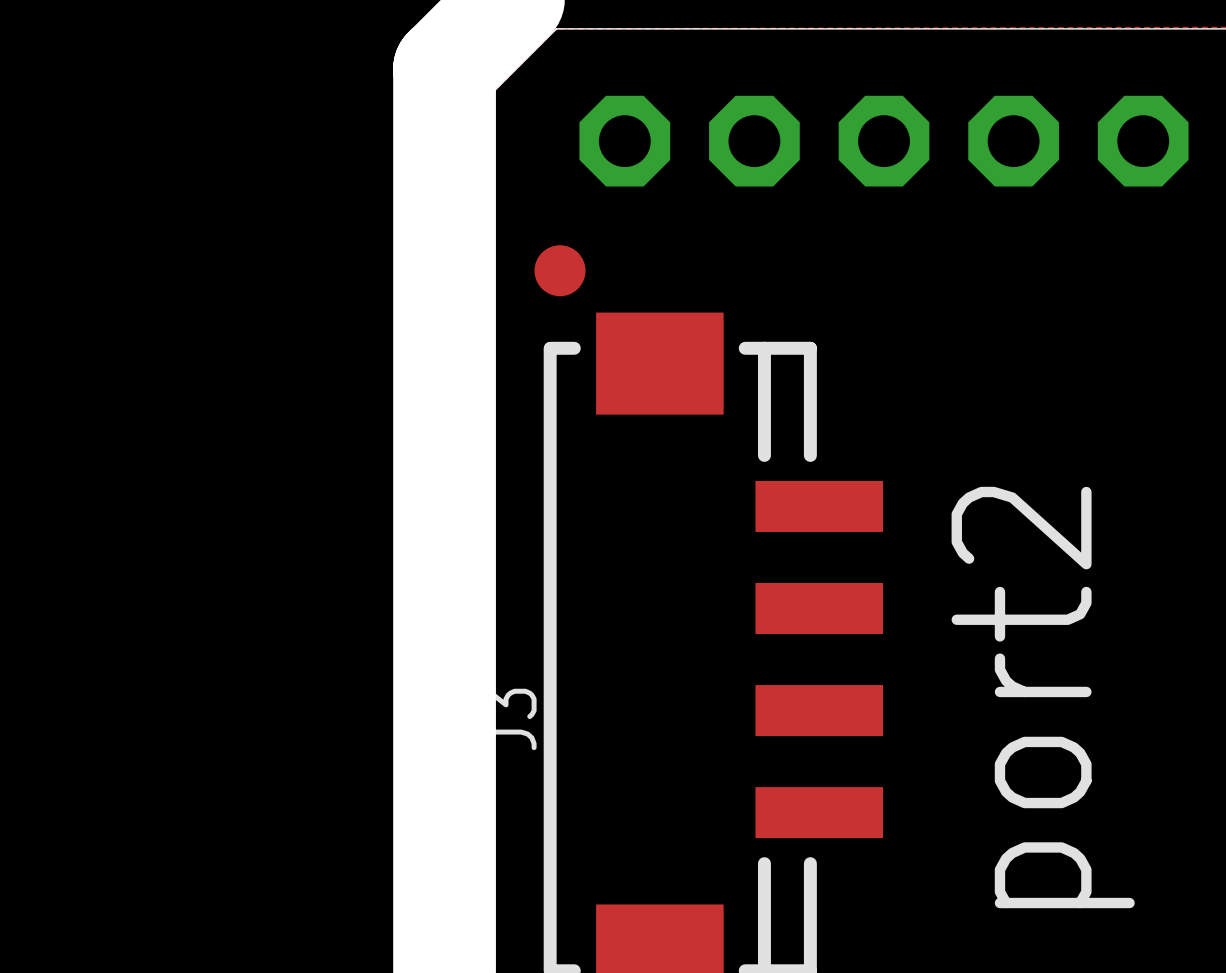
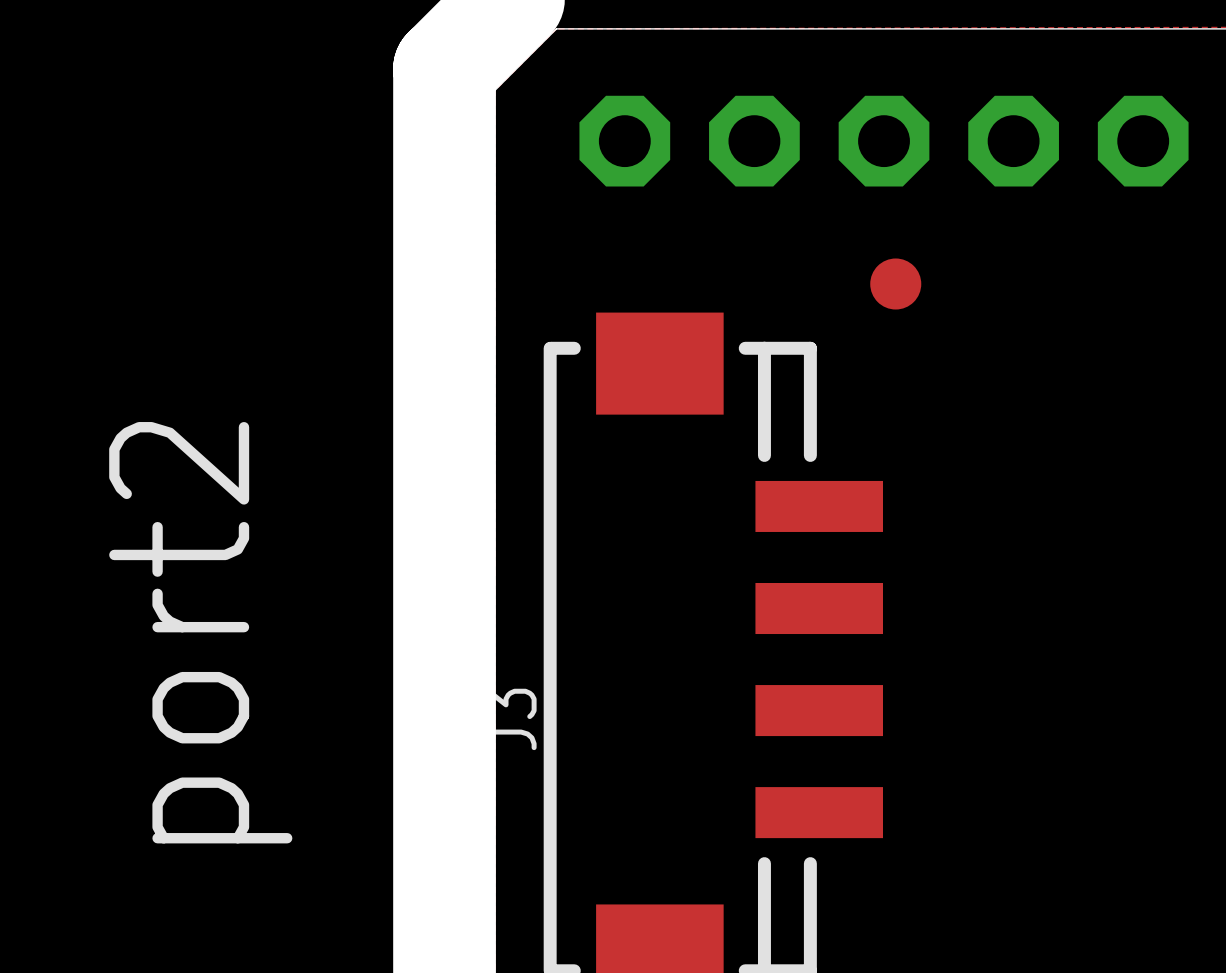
part position: (560, 270) -> (895, 284)
text position: port2 (1043, 697) -> port2 (200, 632)

